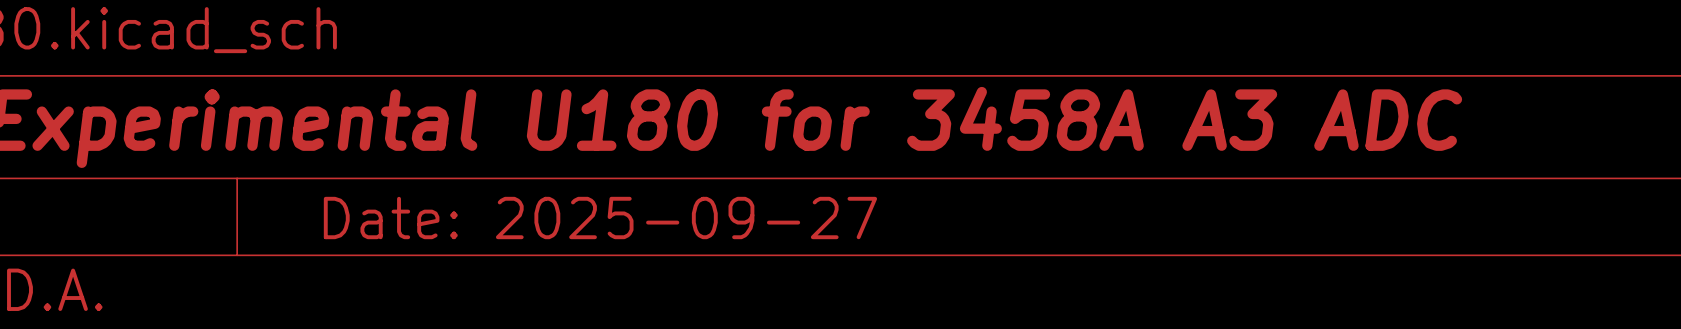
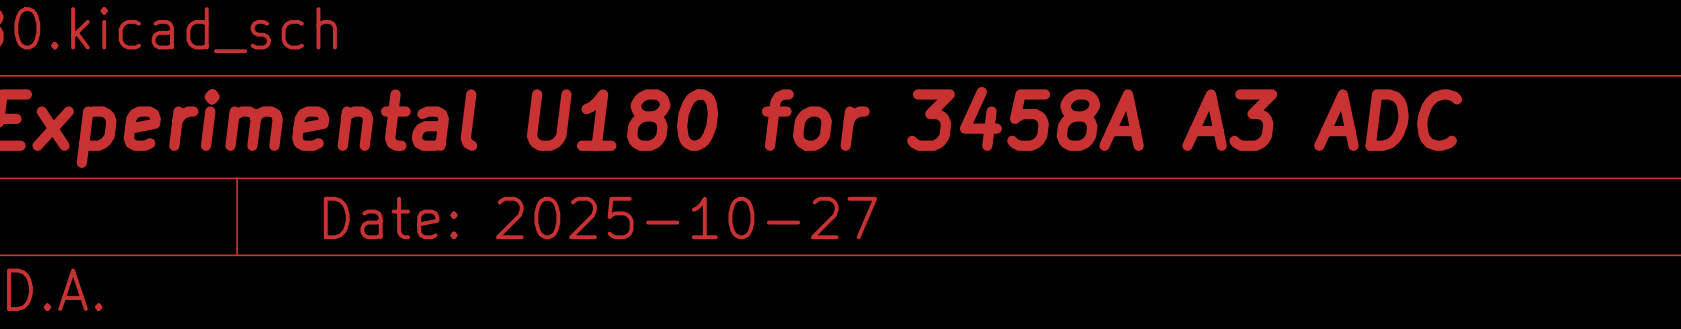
title block: Date: 2025-09-27 (600, 218) -> Date: 2025-10-27 (600, 218)

